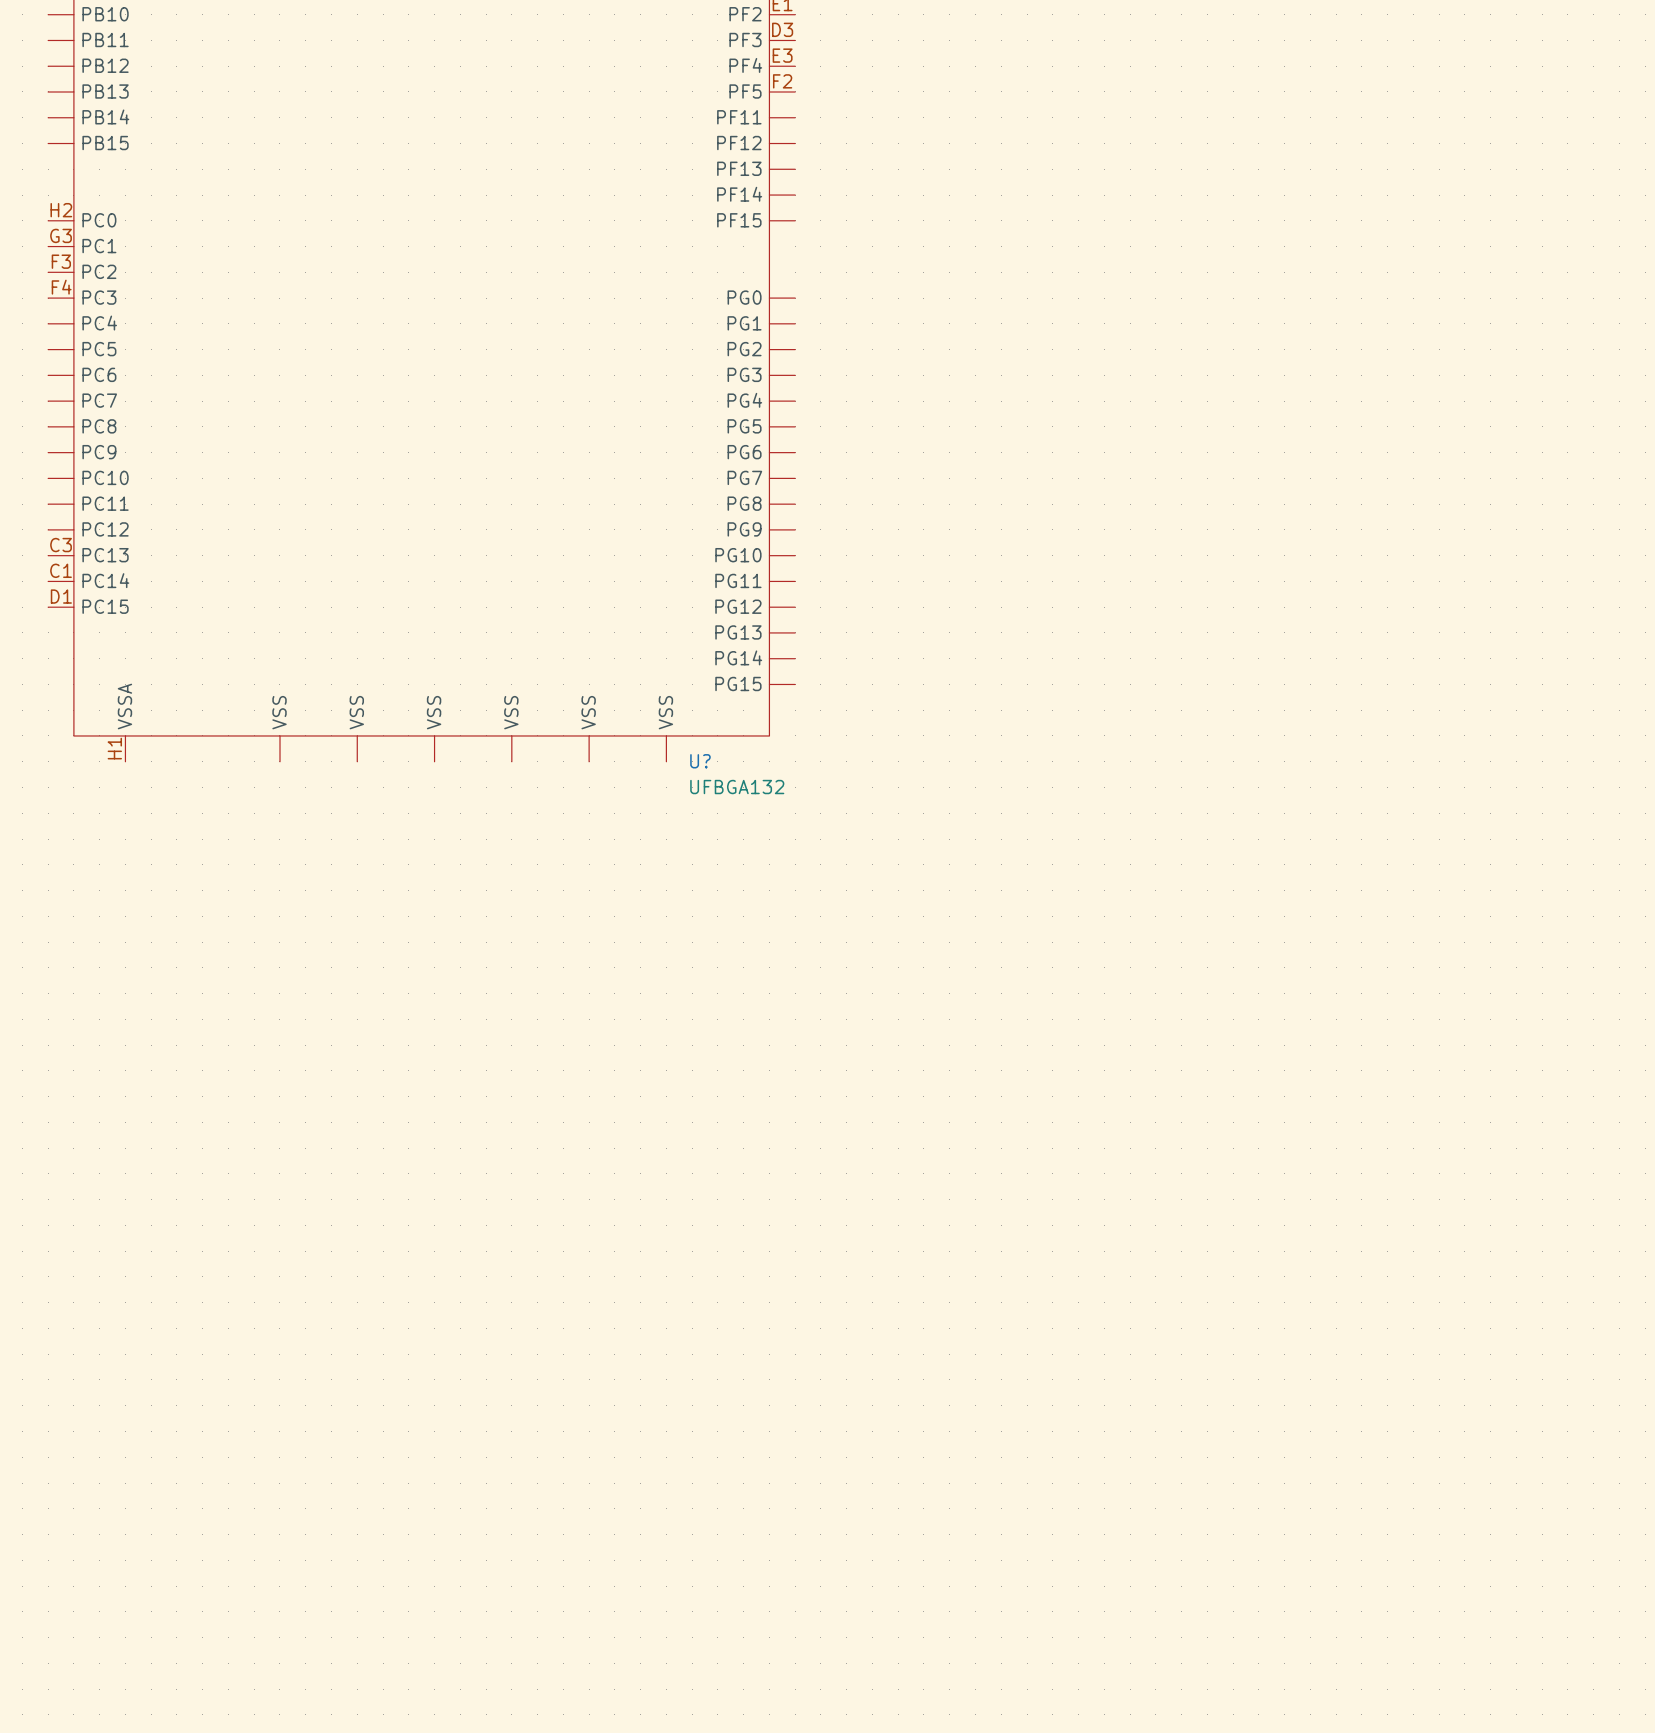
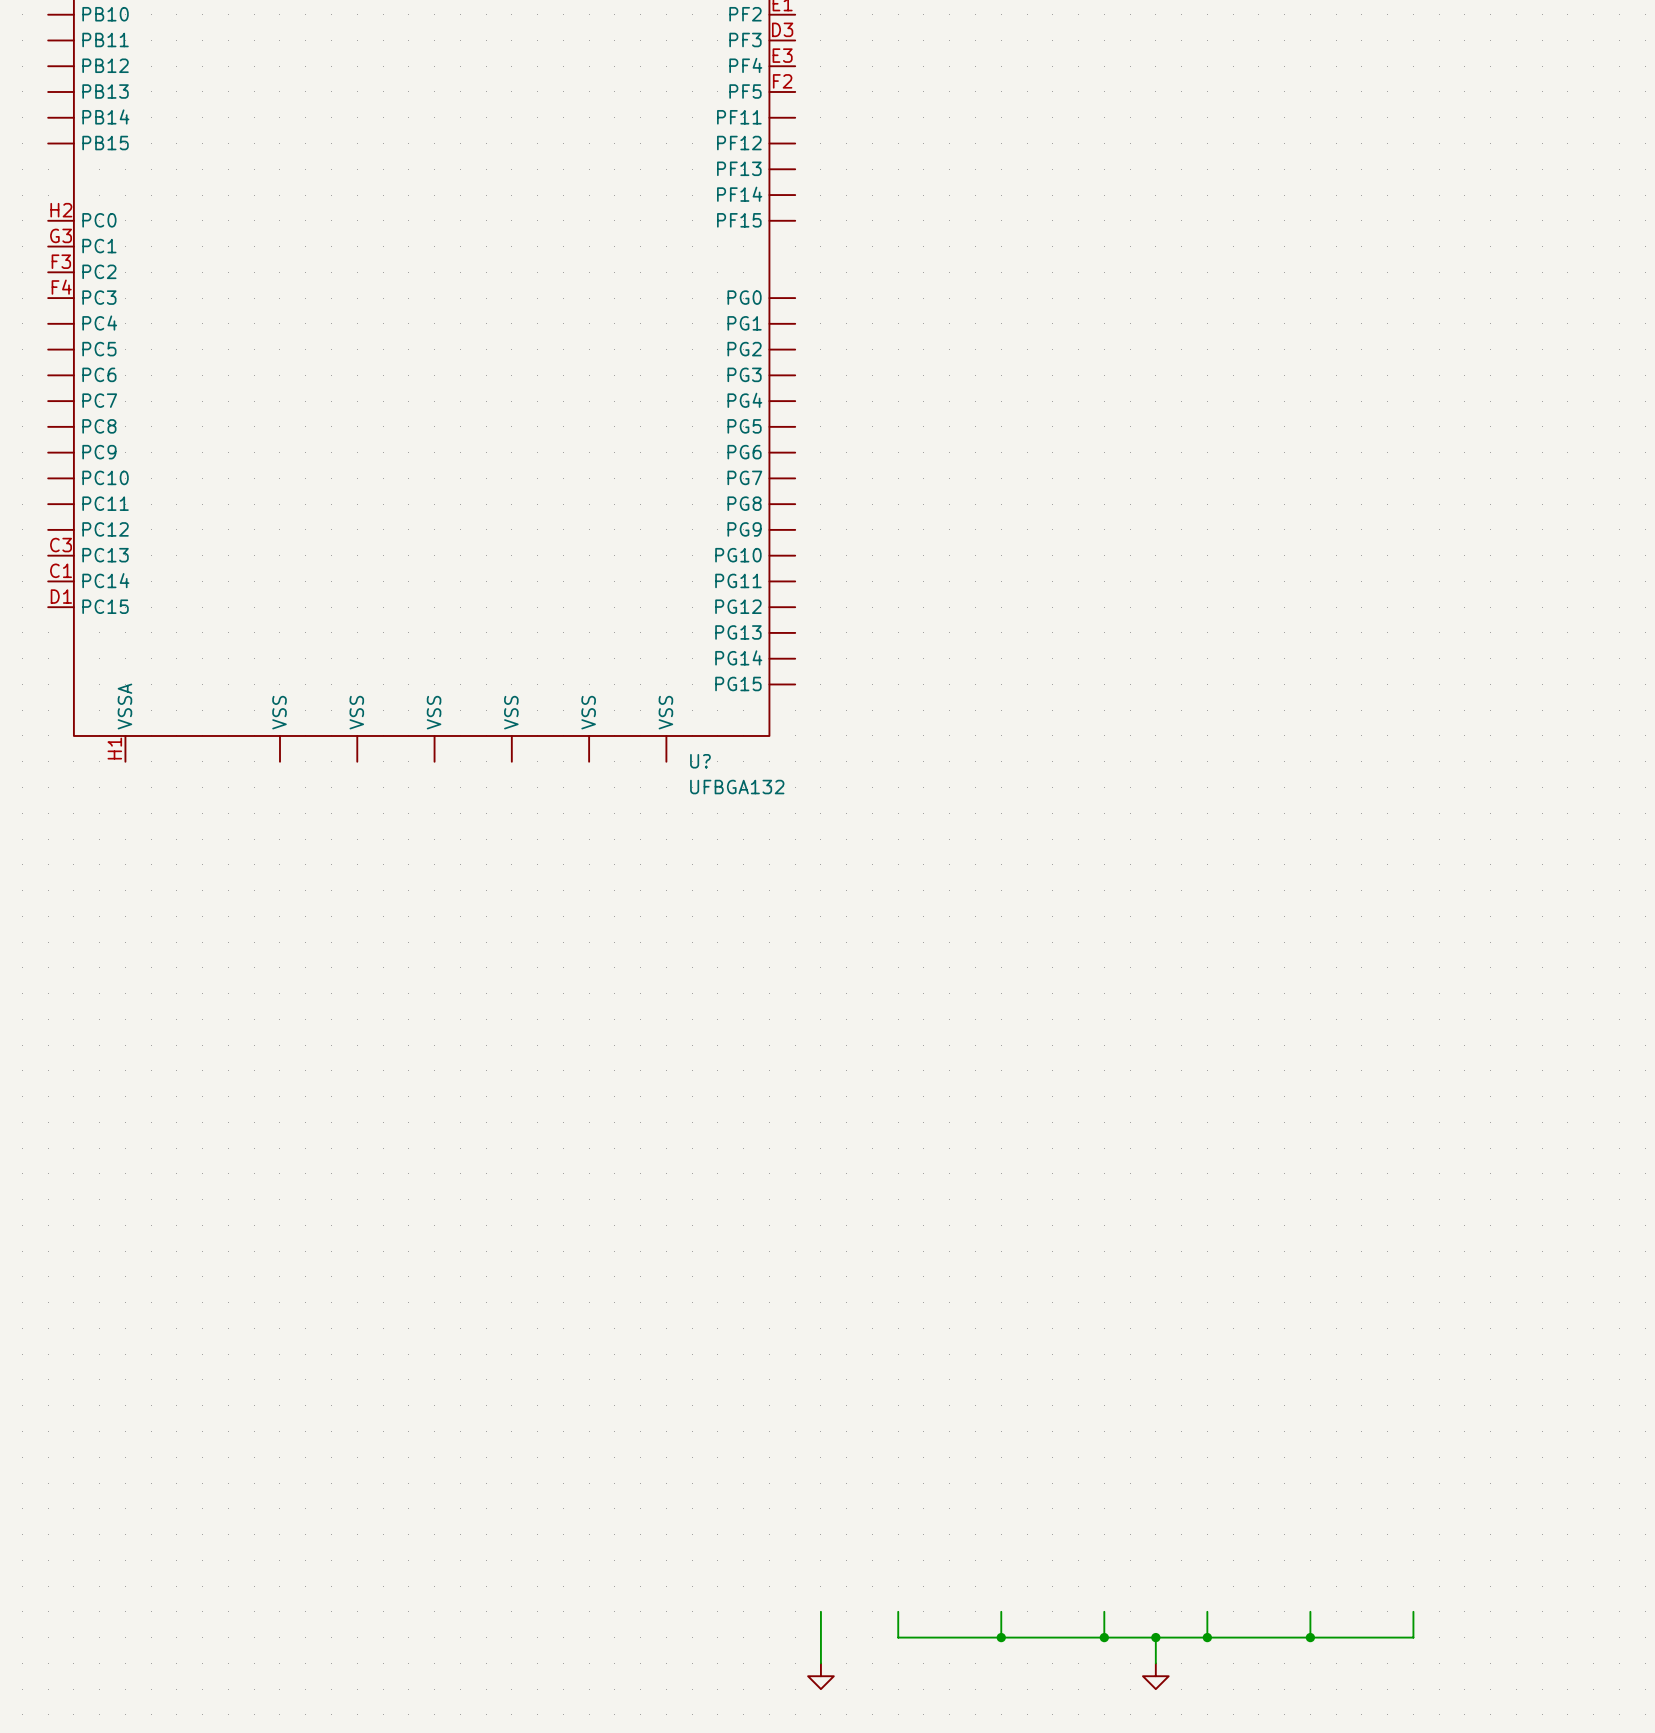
wire: none -> (820, 1611) (820, 1663)
wire: none -> (898, 1611) (898, 1637) (1413, 1637) (1413, 1611)
wire: none -> (1001, 1611) (1001, 1637)
wire: none -> (1104, 1611) (1104, 1637)
wire: none -> (1207, 1611) (1207, 1637)
wire: none -> (1310, 1611) (1310, 1637)
junction: none -> (1001, 1637)
junction: none -> (1104, 1637)
wire: none -> (1155, 1637) (1155, 1663)
junction: none -> (1155, 1637)
junction: none -> (1207, 1637)
junction: none -> (1310, 1637)
power symbol: none -> (820, 1676)
power symbol: none -> (1155, 1676)

